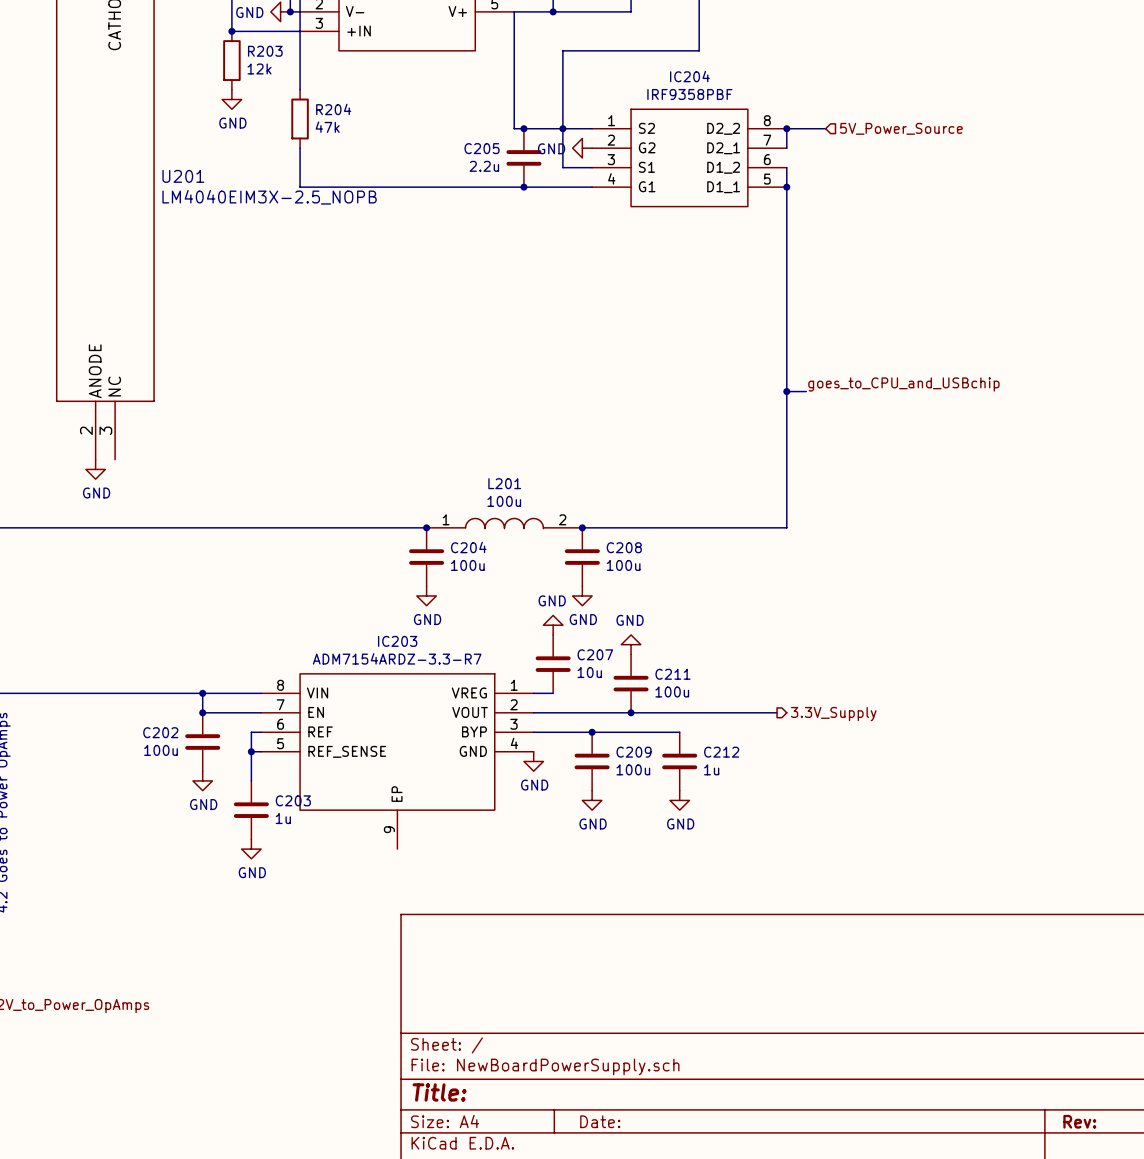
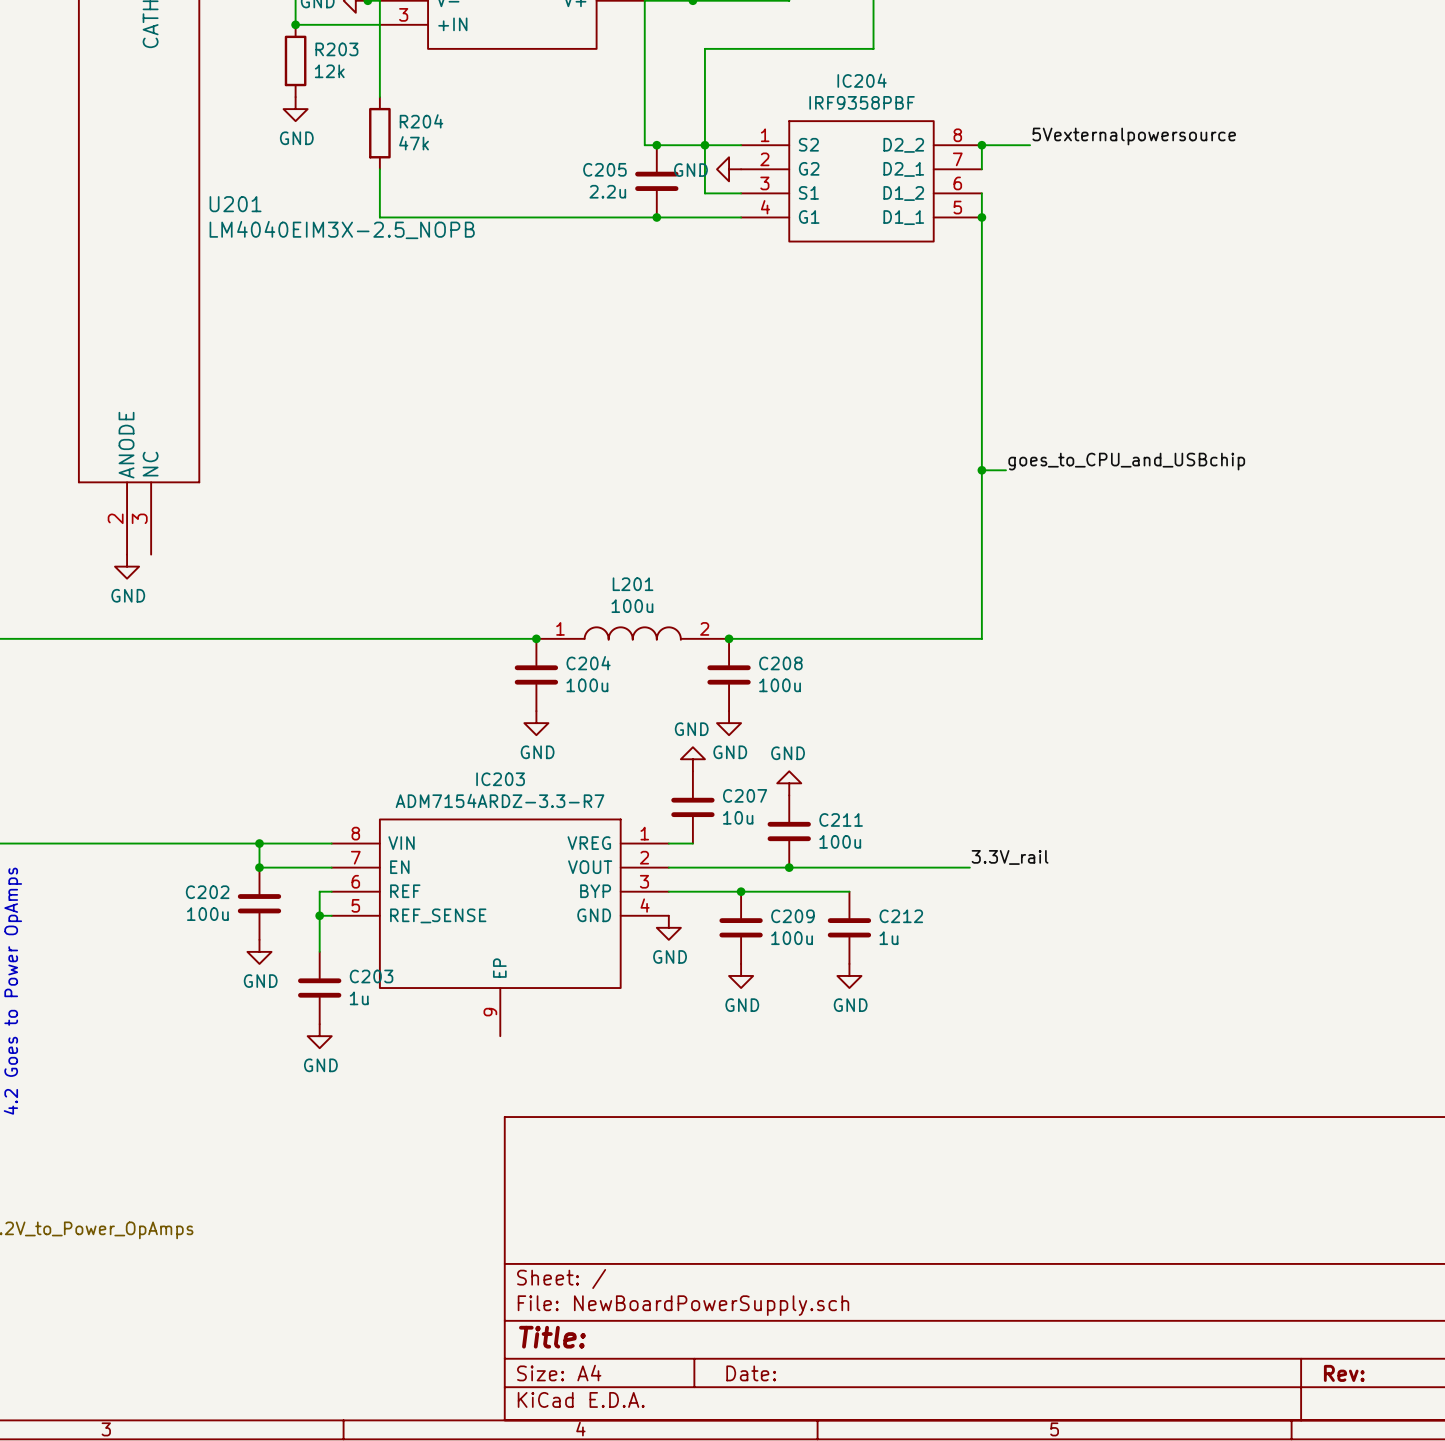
label: none -> 5Vexternalpowersource (1134, 136)
hierarchical label: 5V_Power_Source (901, 128) -> none
label: none -> 3.3V_rail (1010, 857)
hierarchical label: 3.3V_Supply (833, 714) -> none

